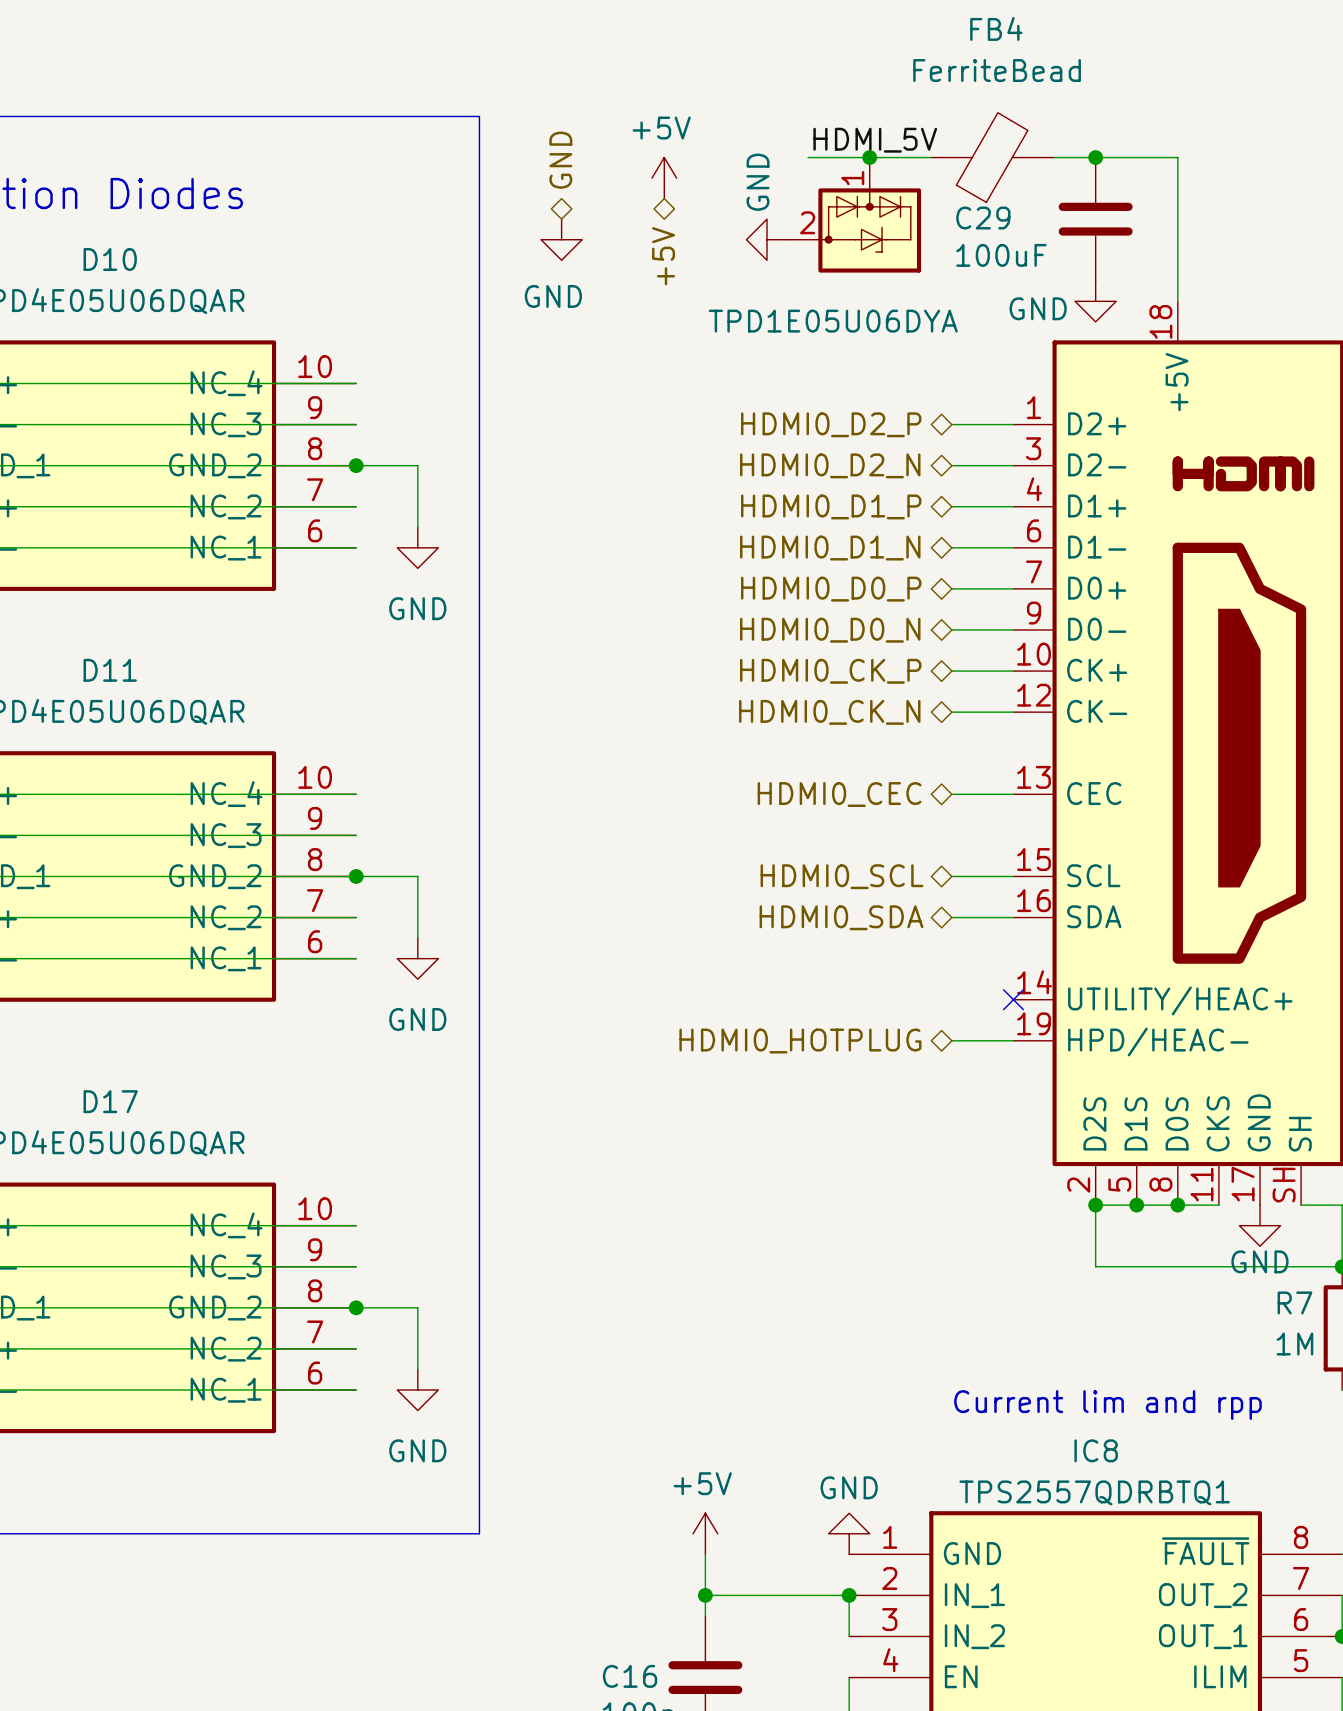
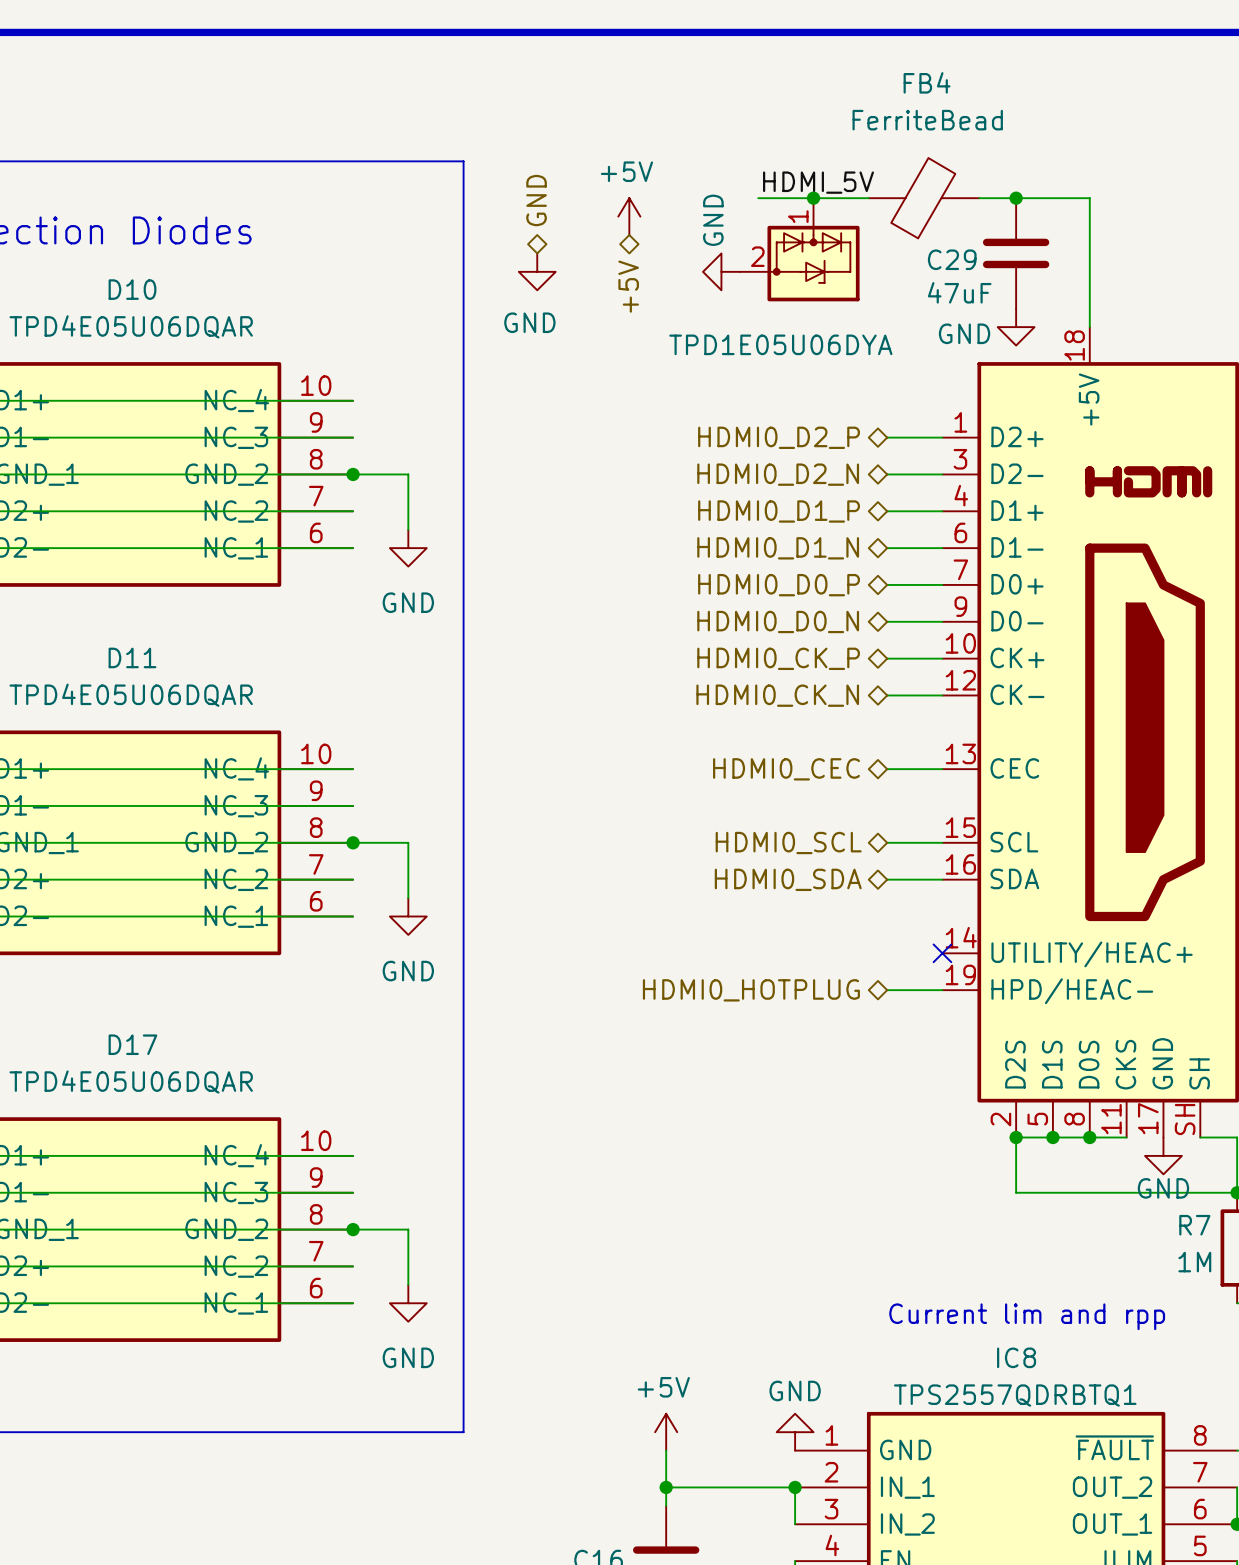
C29 name position: C29 (983, 218) -> C29 (952, 259)
C29 value: 100uF (1001, 255) -> 47uF (959, 292)

